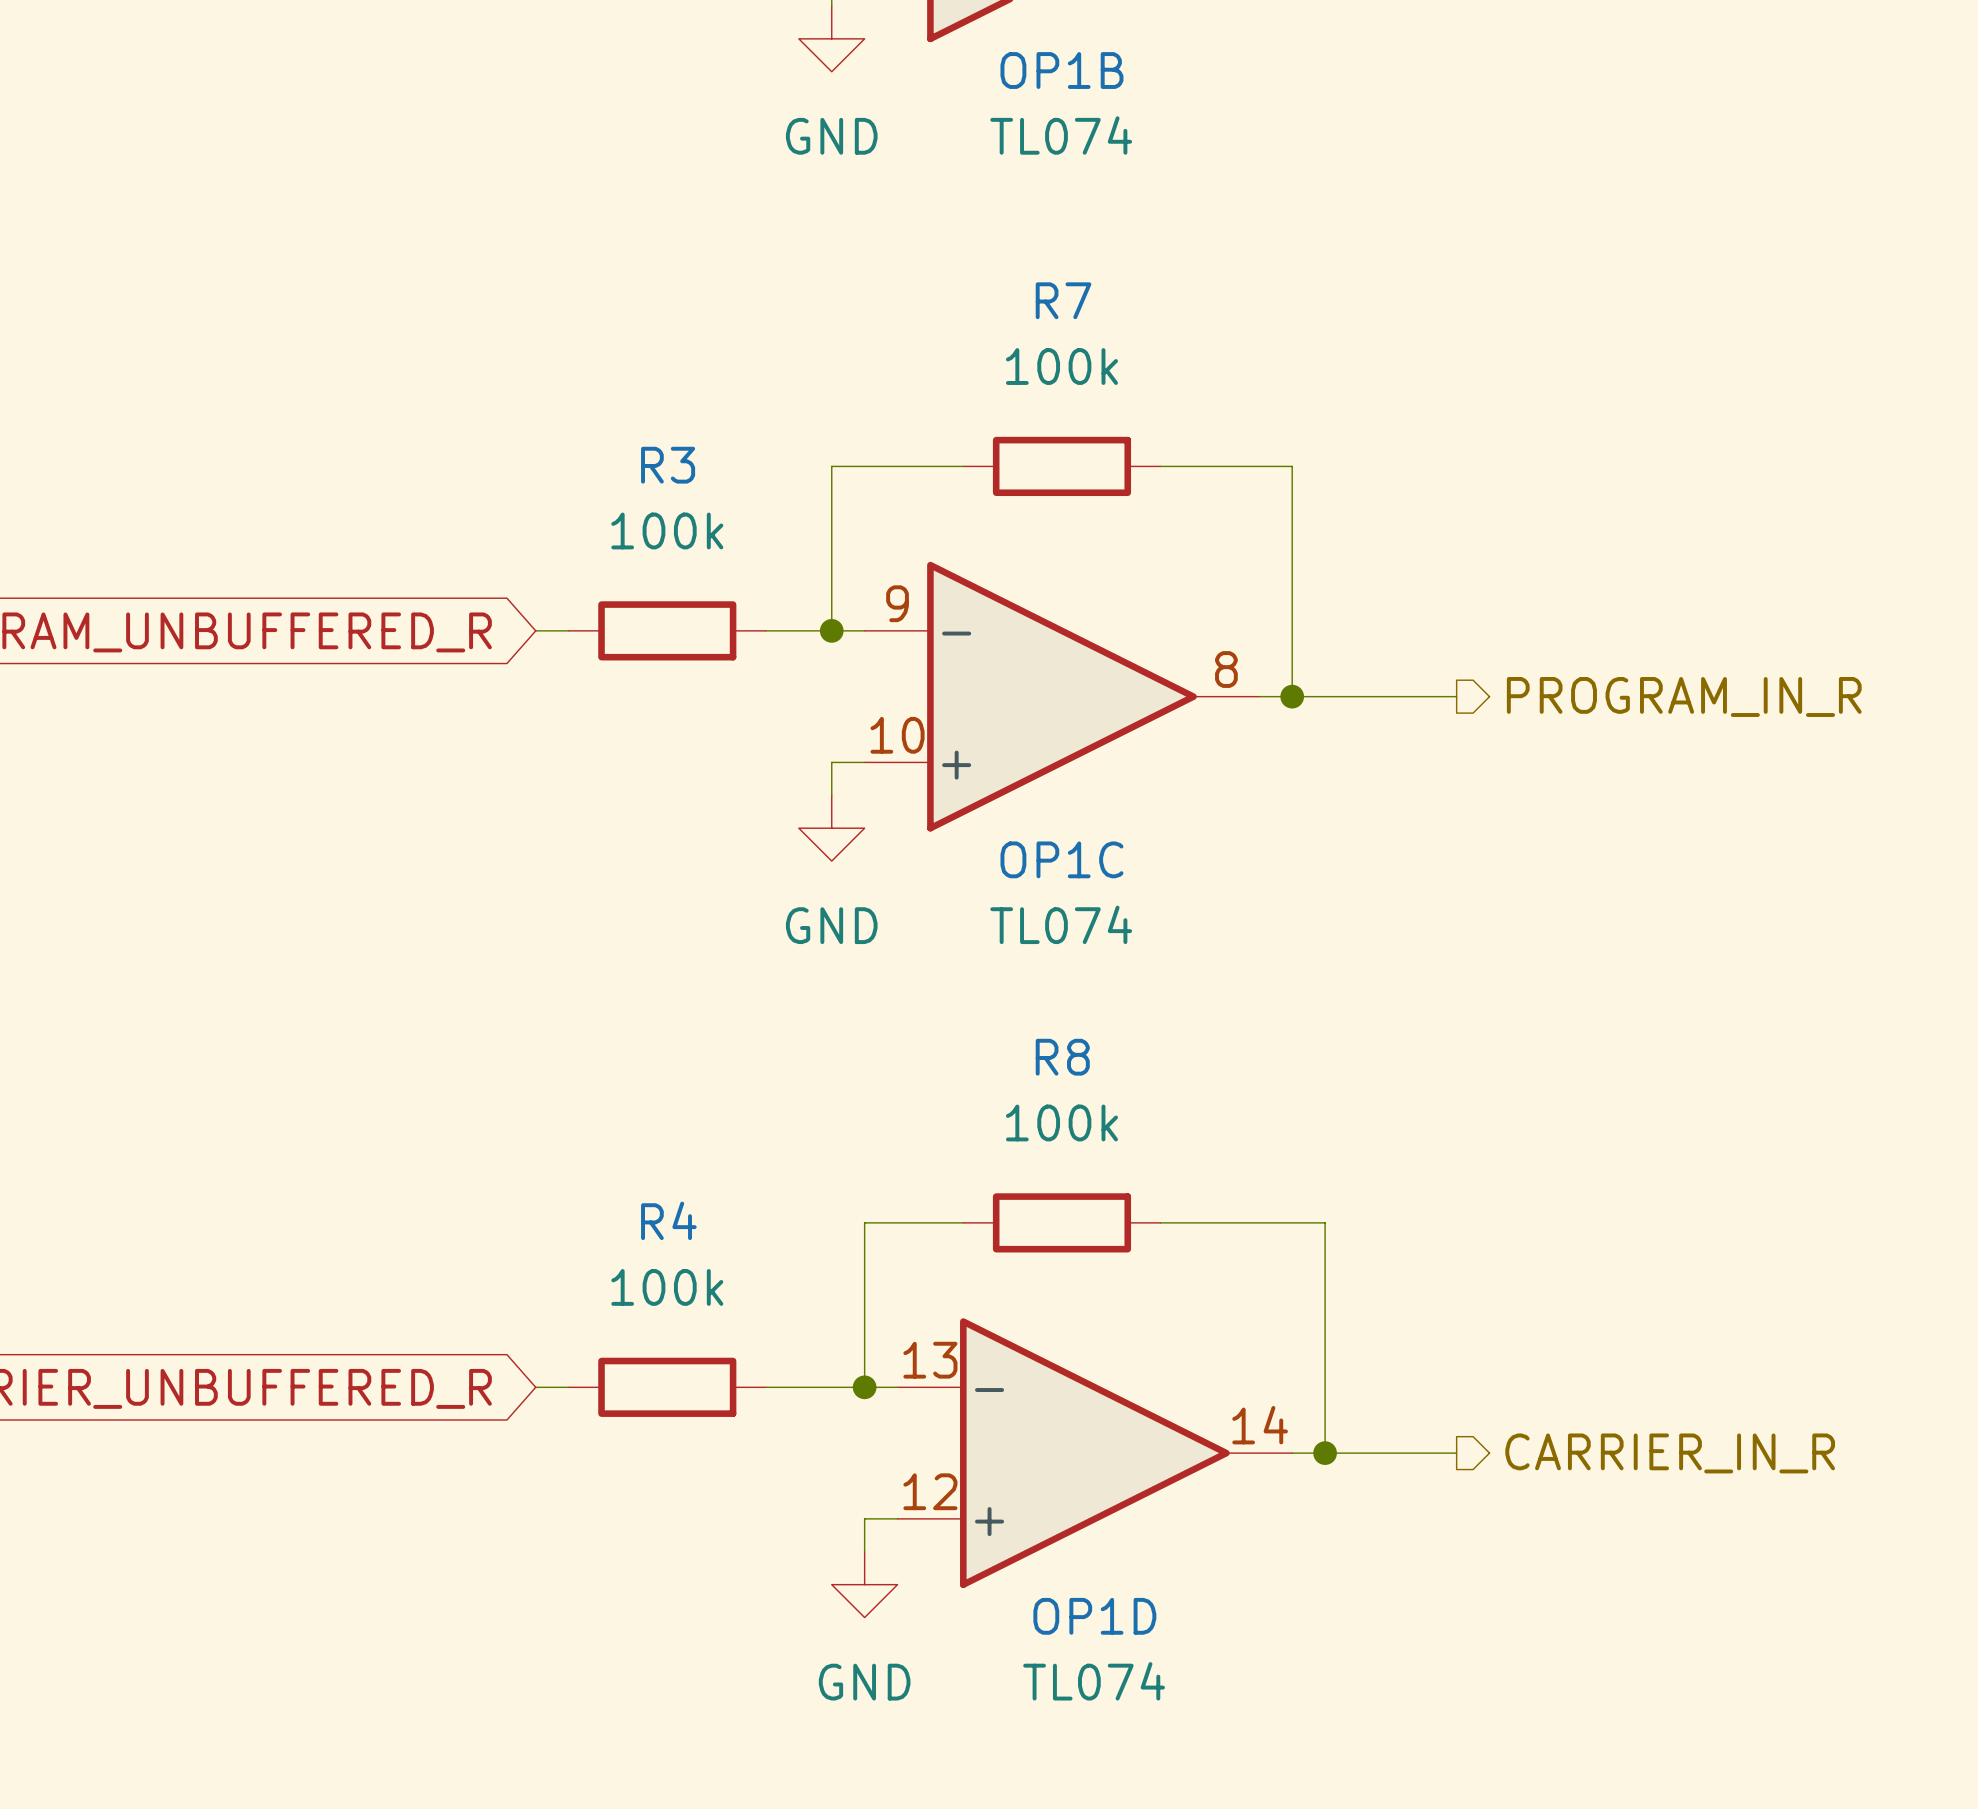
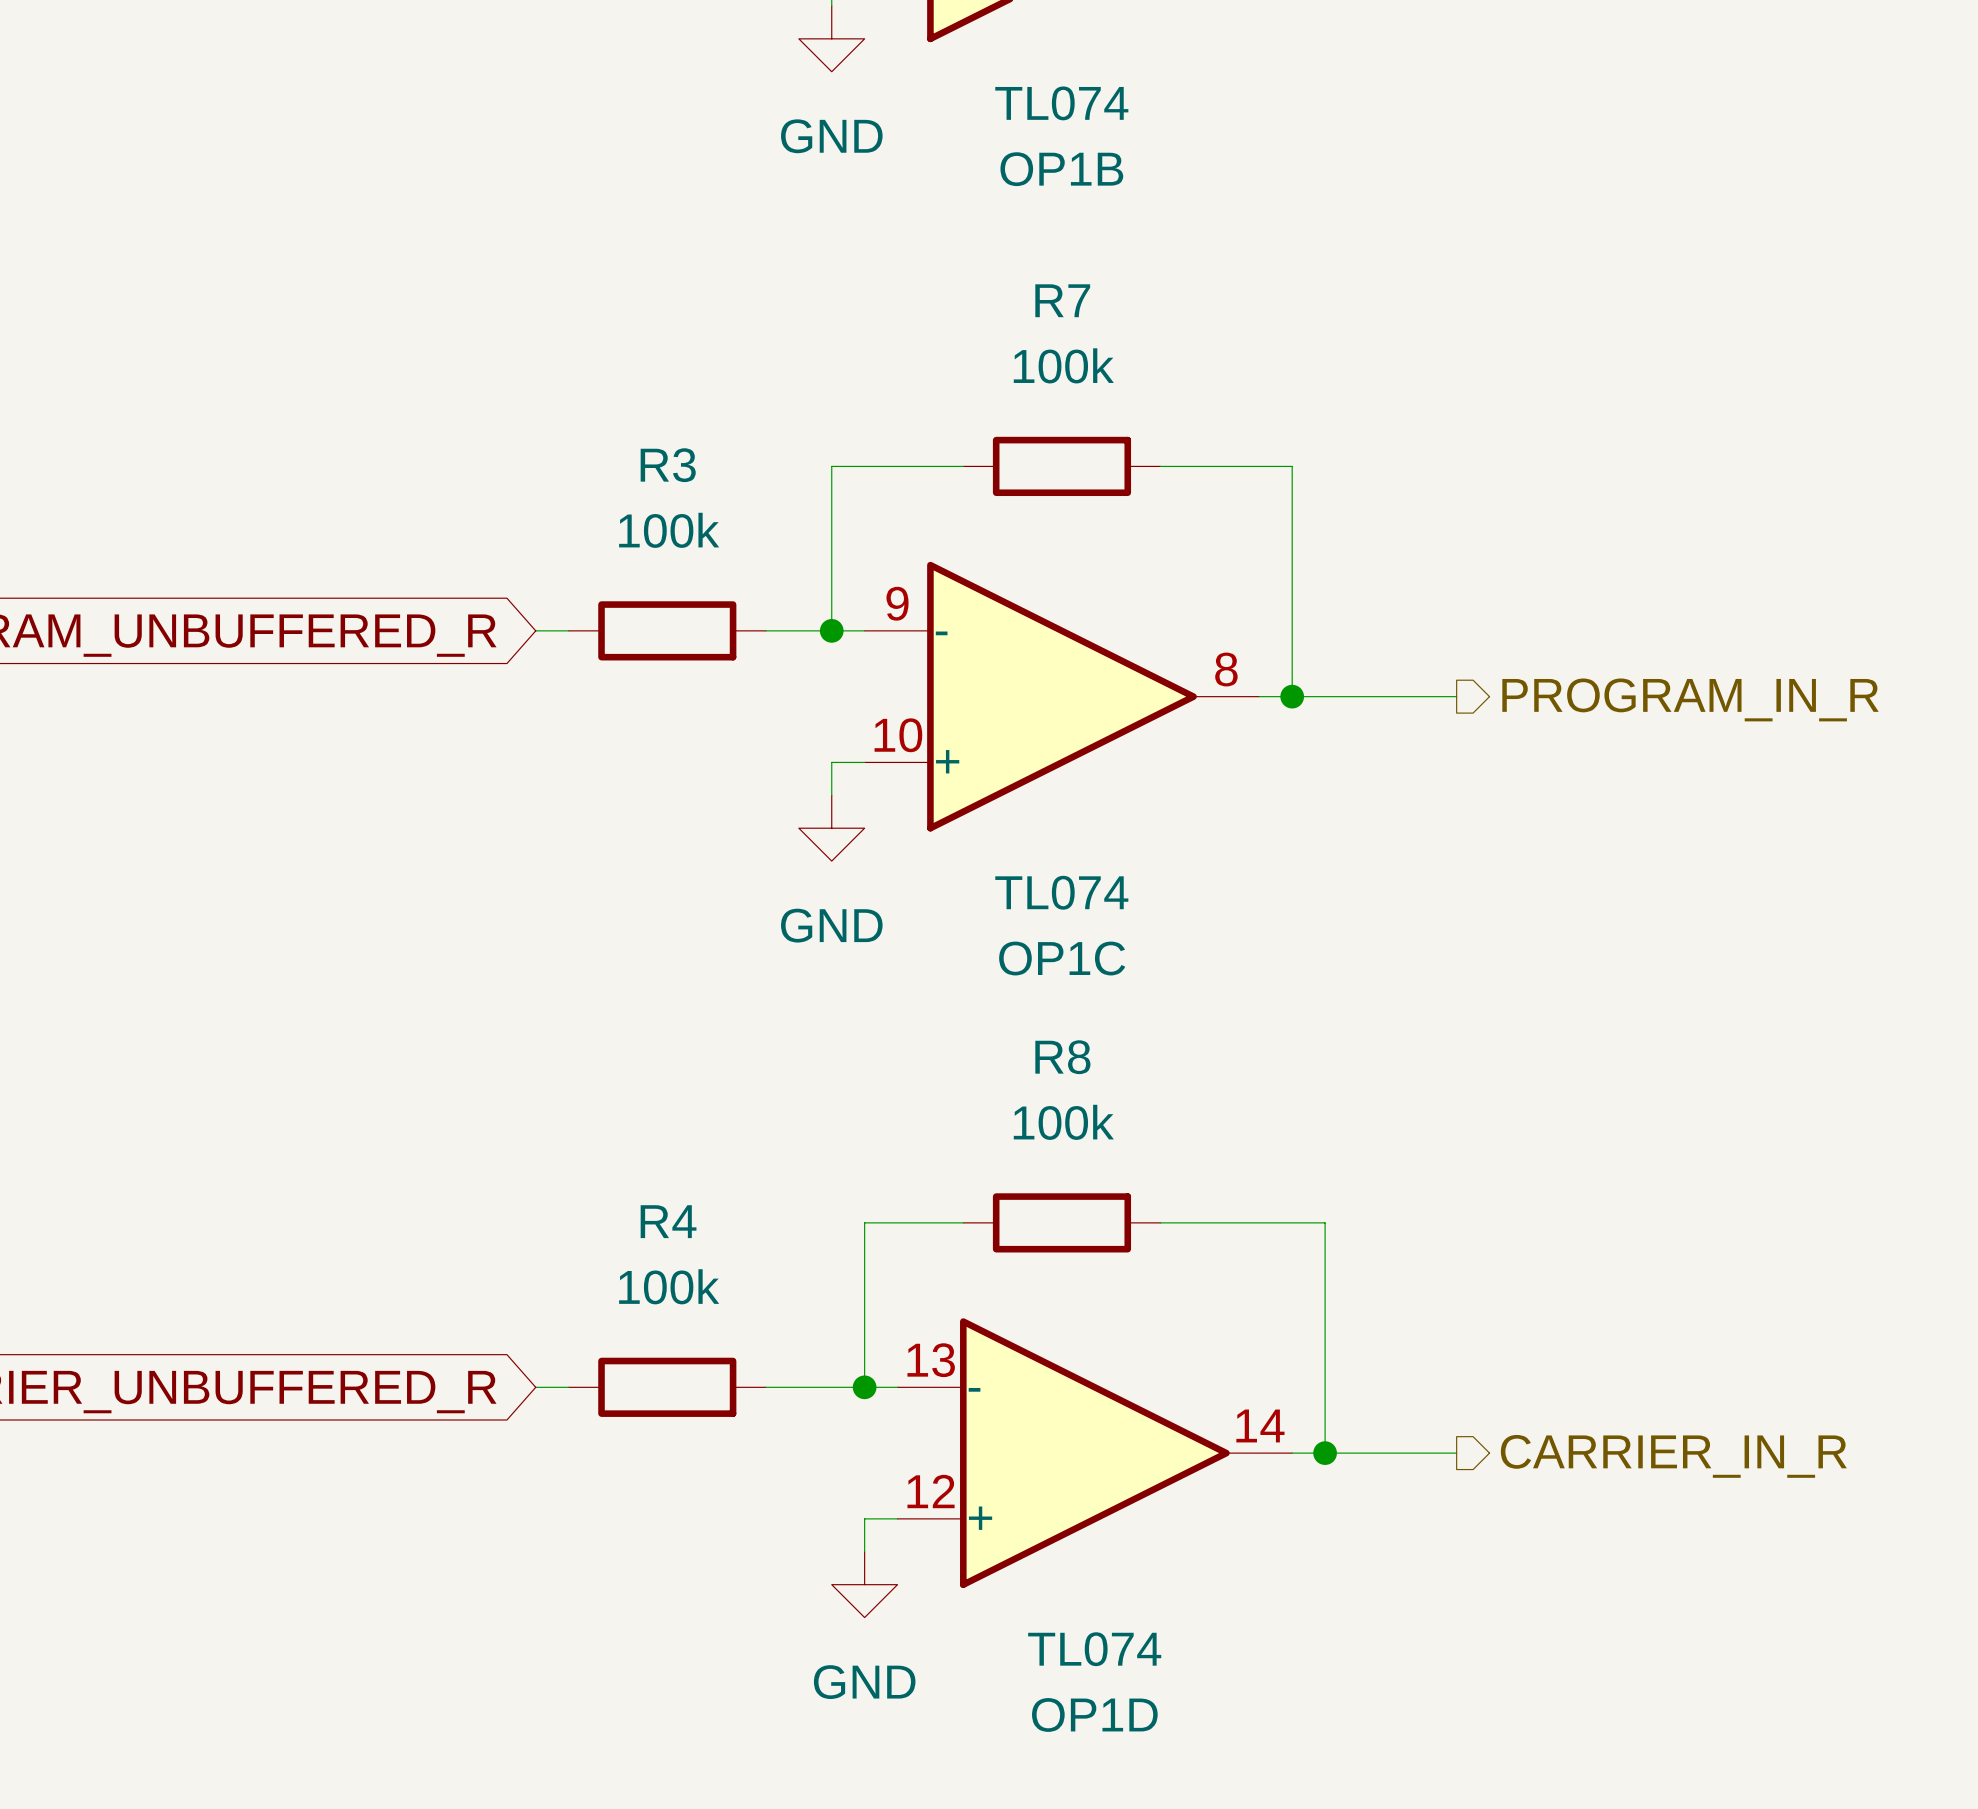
OP1B name position: OP1B (1061, 70) -> OP1B (1061, 169)
OP1B value position: TL074 (1061, 135) -> TL074 (1061, 103)
OP1C name position: OP1C (1061, 859) -> OP1C (1062, 958)
OP1C value position: TL074 (1061, 924) -> TL074 (1061, 892)
OP1D name position: OP1D (1094, 1616) -> OP1D (1094, 1714)
OP1D value position: TL074 (1094, 1681) -> TL074 (1094, 1649)

